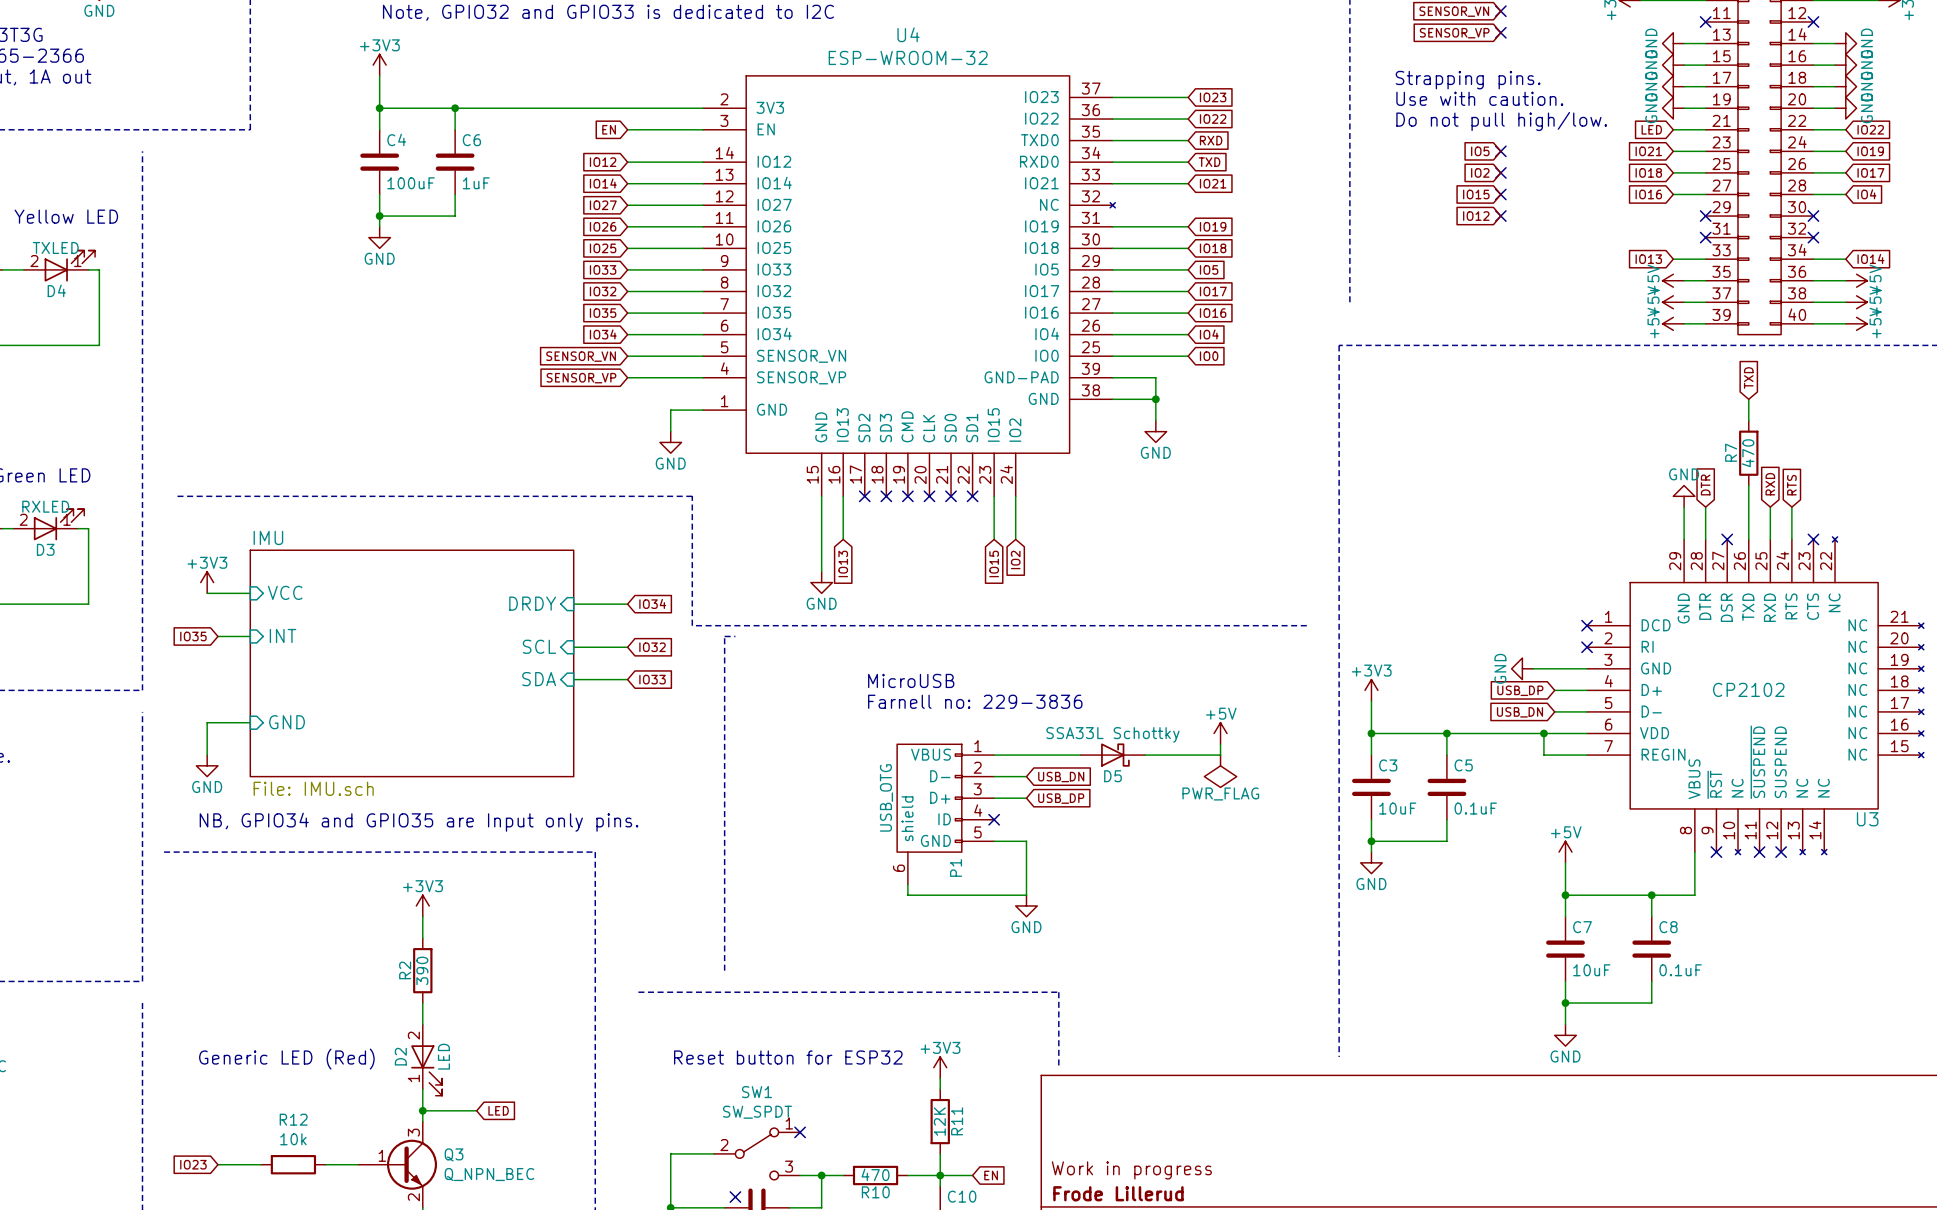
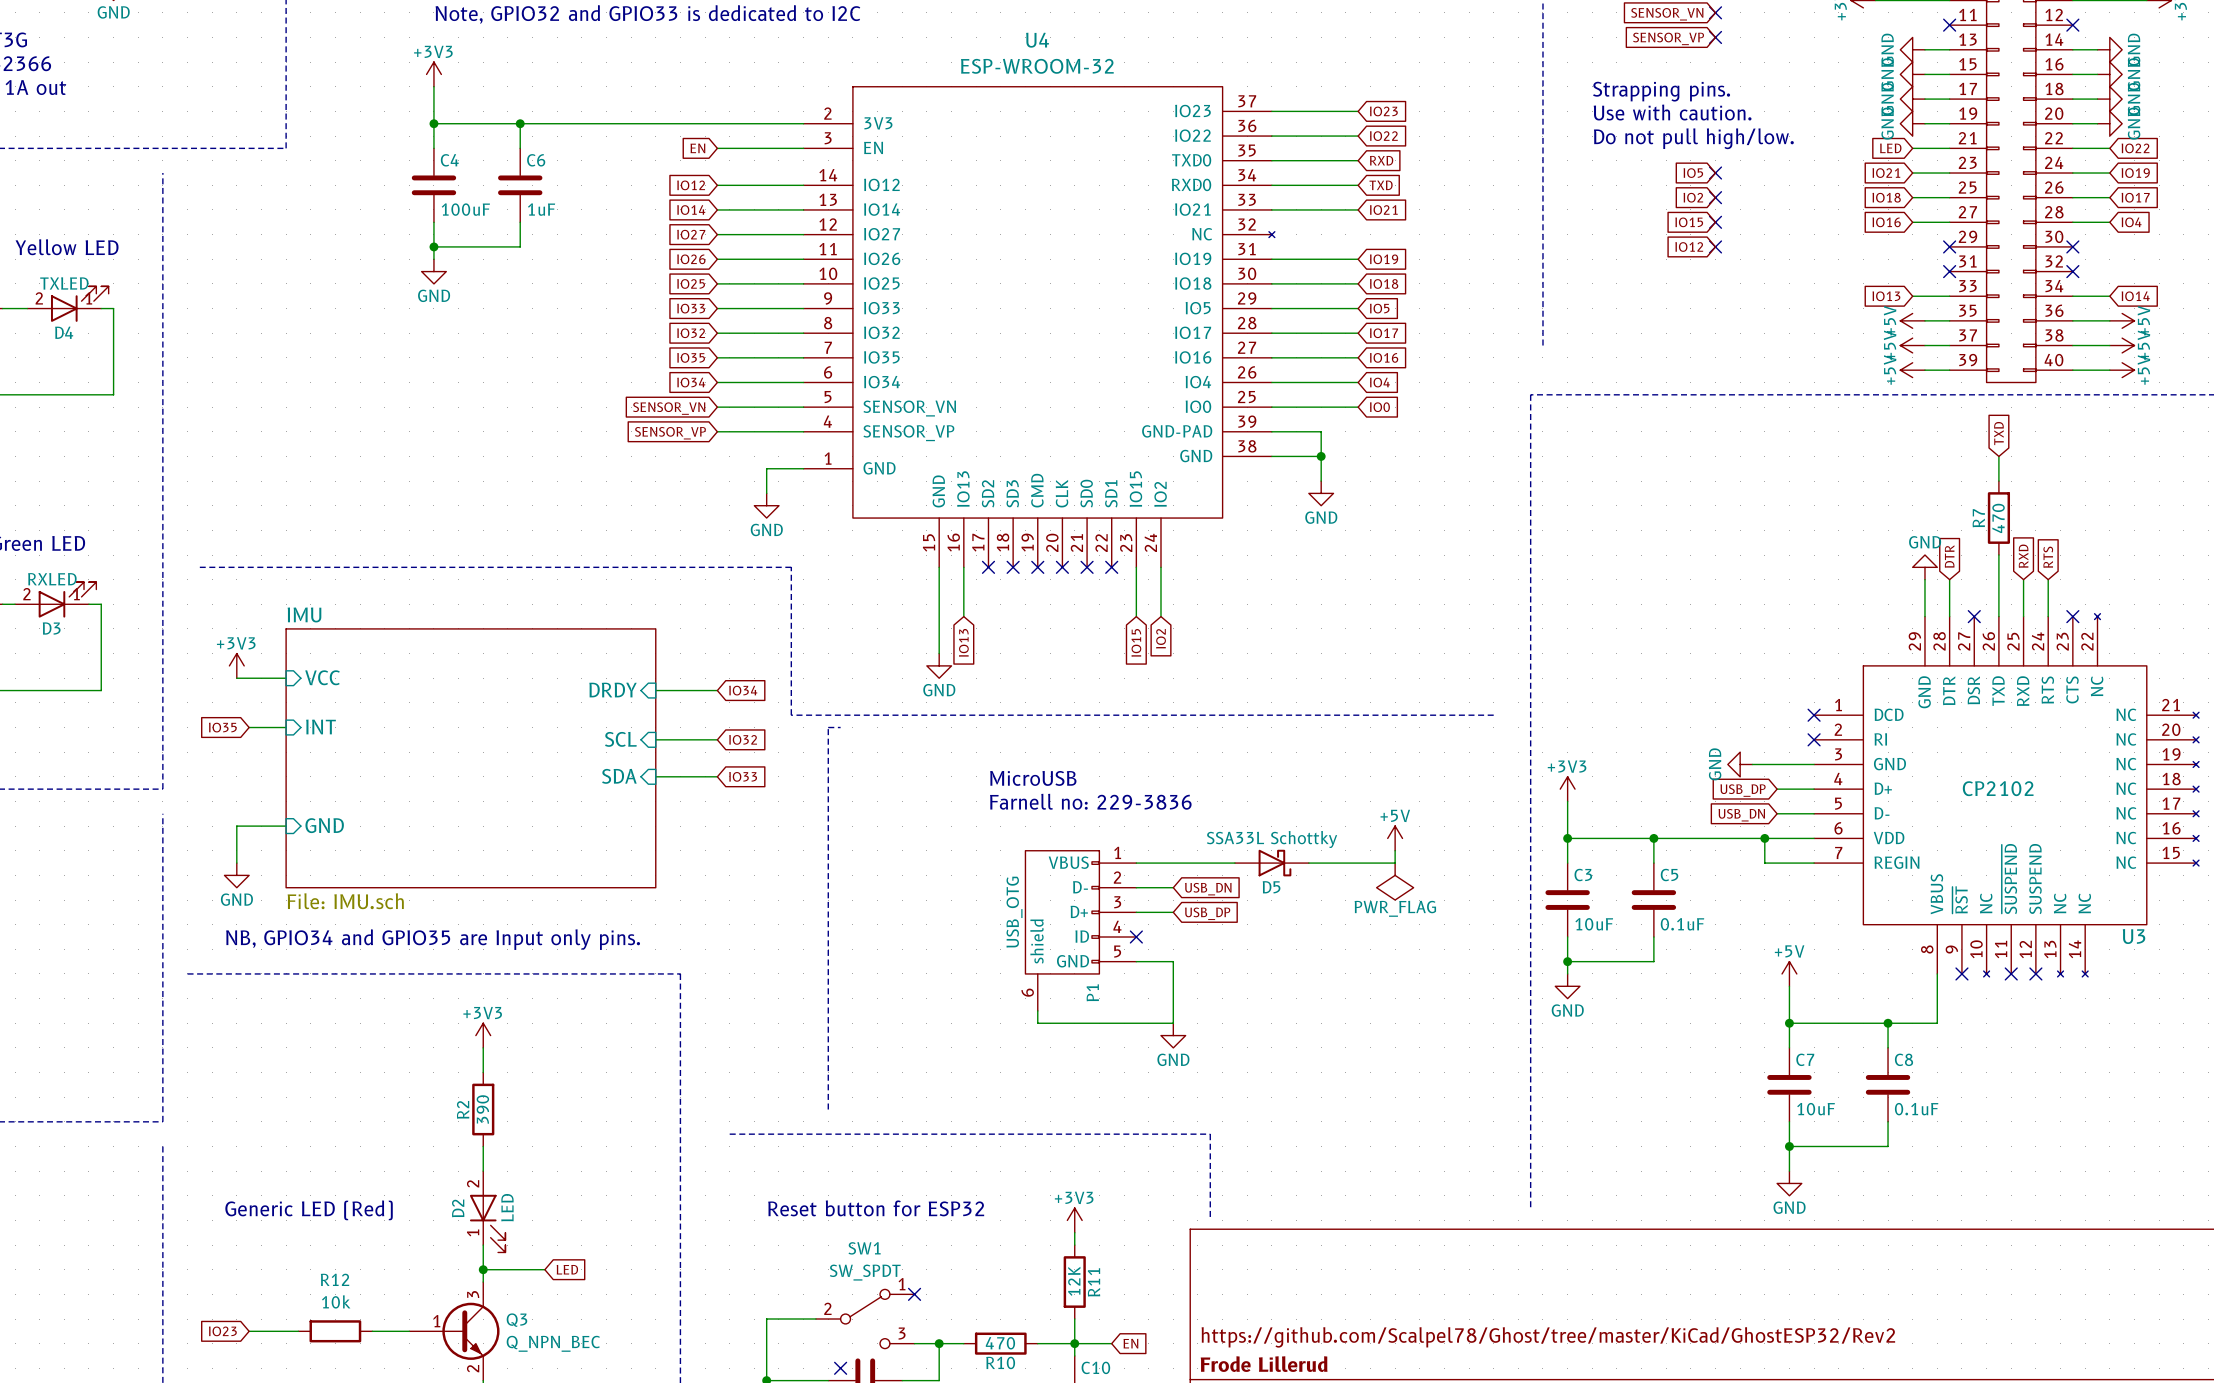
title block: Work in progress (1131, 1170) -> https://github.com/Scalpel78/Ghost/tree/master/KiCad/GhostESP32/Rev2 (1548, 1337)

